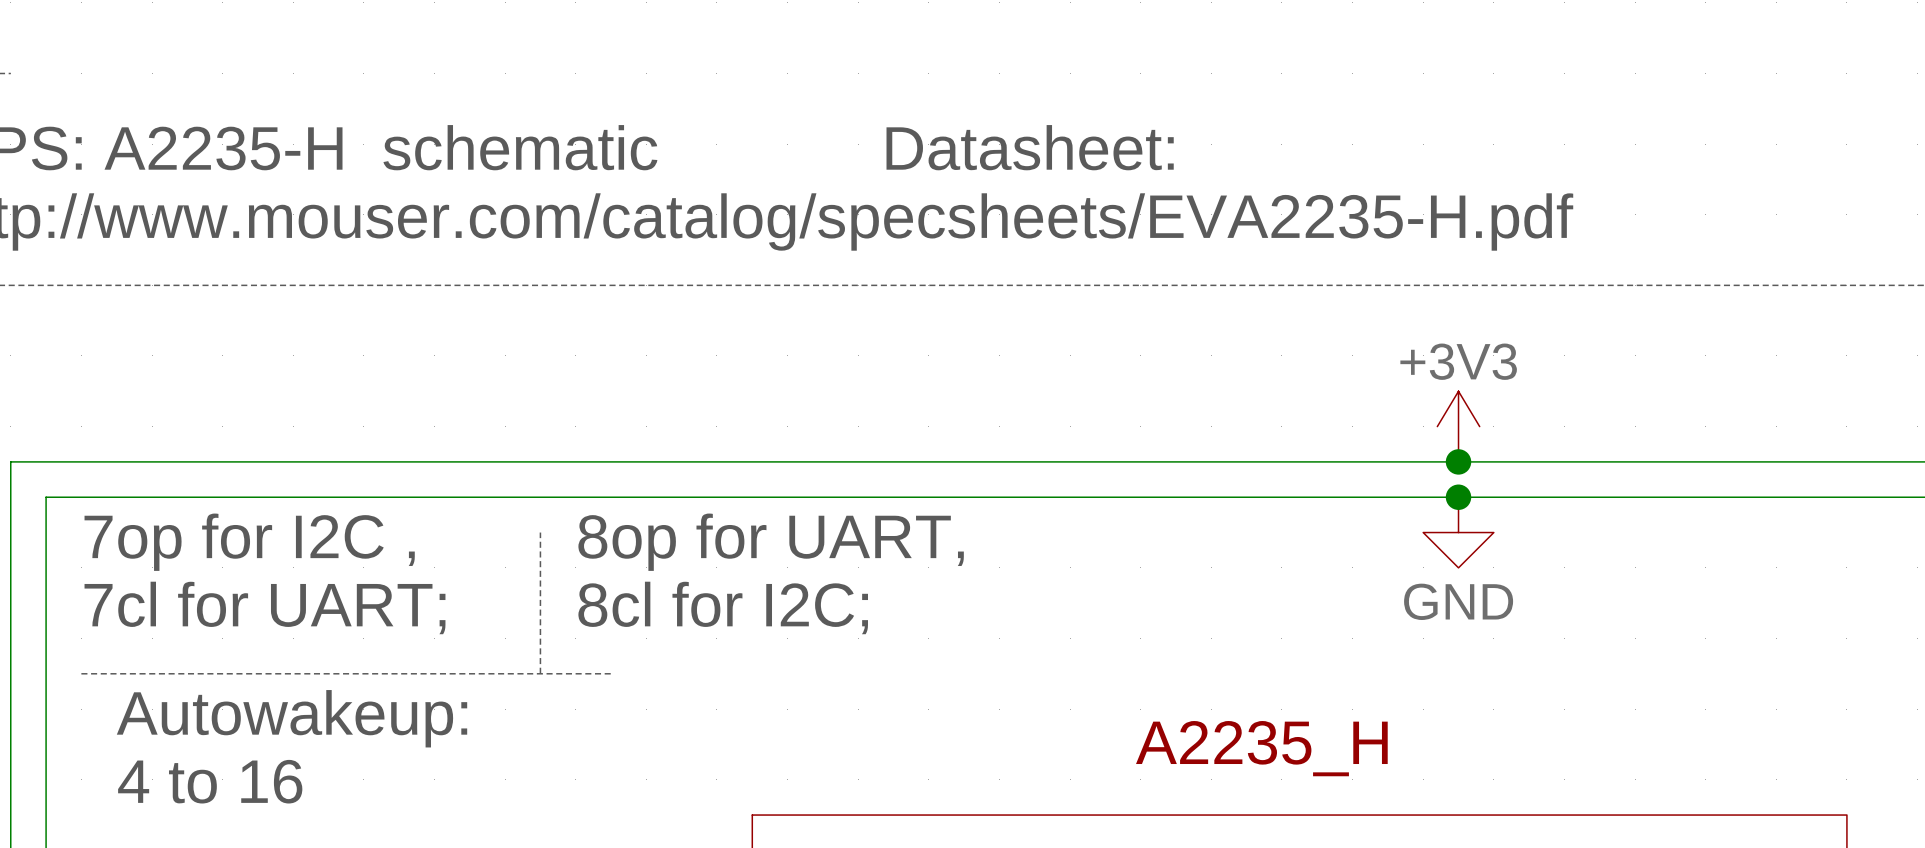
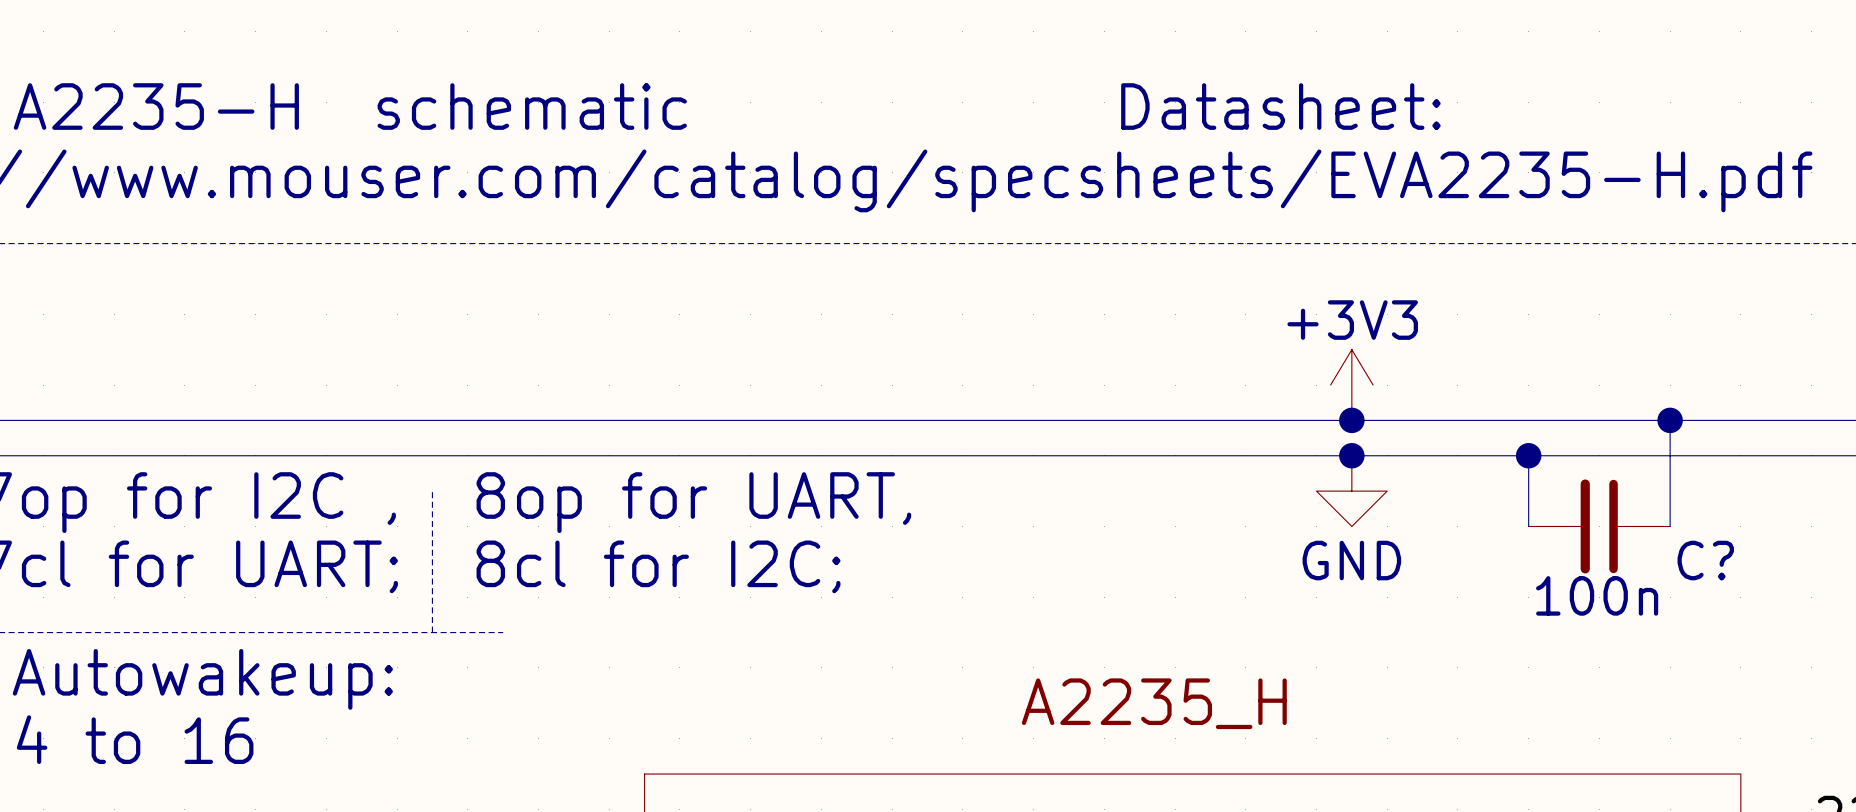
wire: none -> (1670, 420) (1670, 526)
junction: none -> (1670, 420)
wire: none -> (1528, 455) (1528, 526)
junction: none -> (1528, 455)
C?: none -> 100n (1599, 526)

